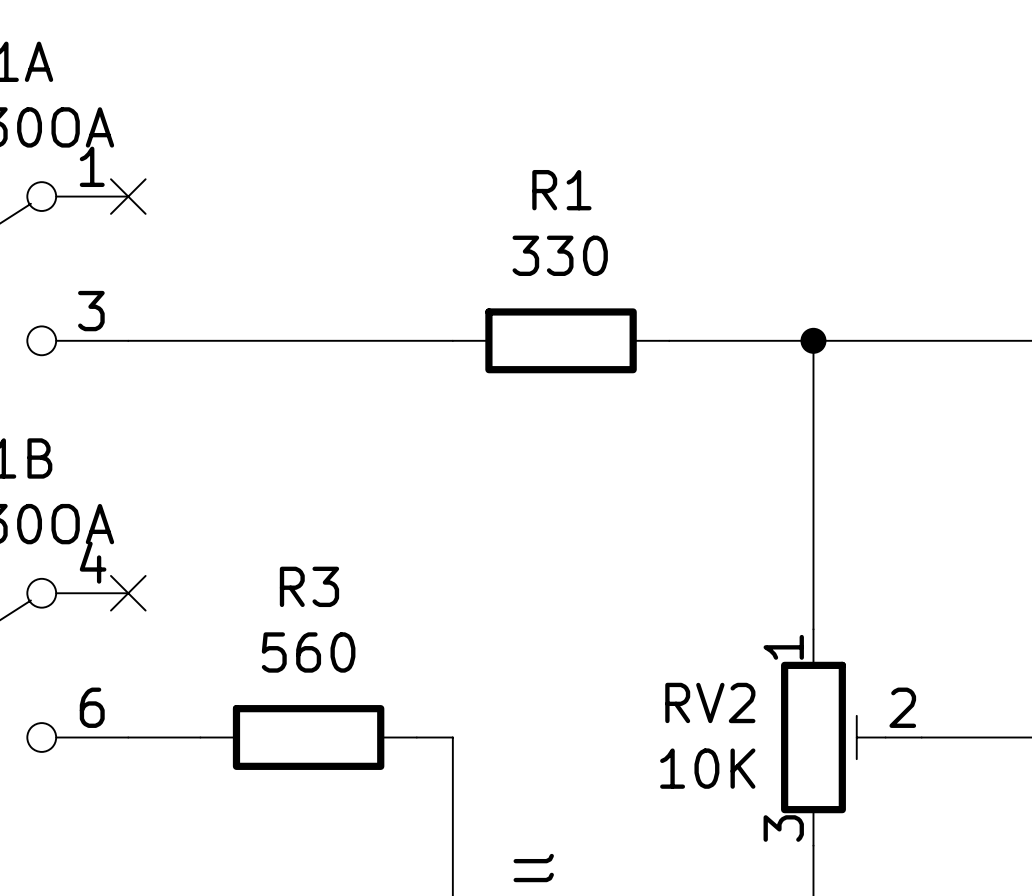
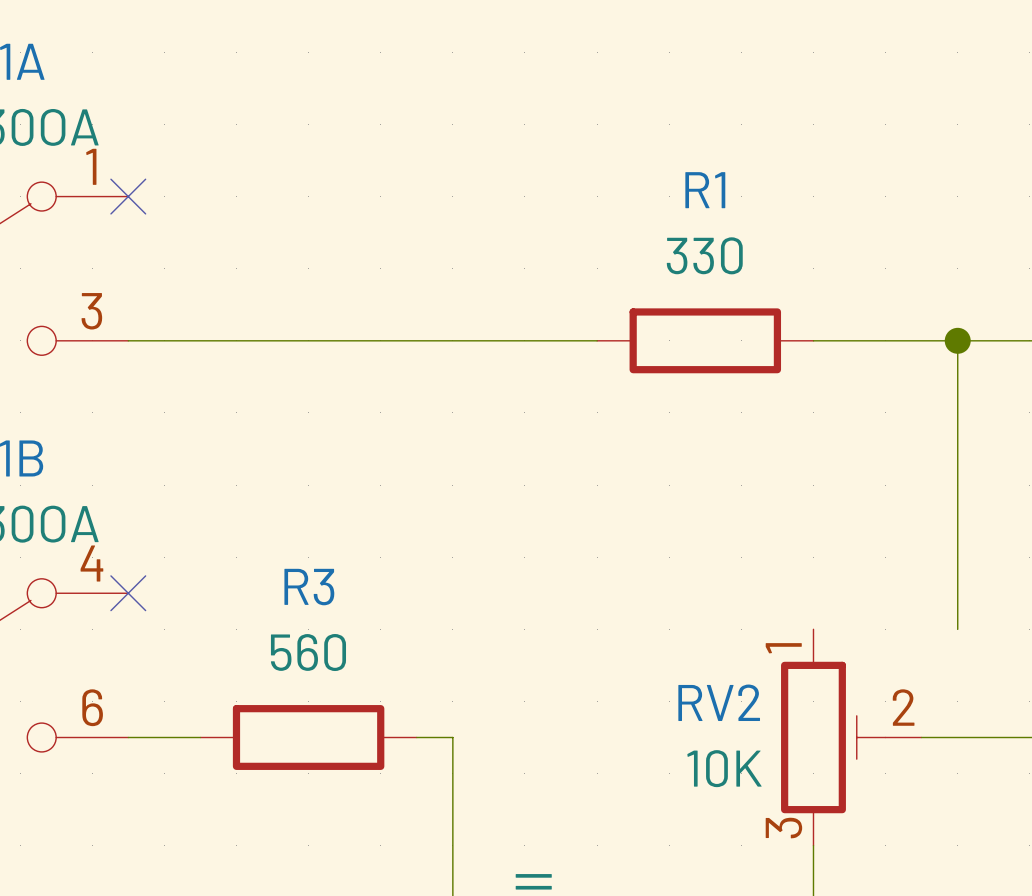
wire: none -> (452, 340) (597, 340)
R1 position: (561, 340) -> (705, 340)
wire: (669, 340) (813, 340) (813, 629) -> none
junction: (813, 340) -> none
wire: none -> (957, 340) (957, 629)
junction: none -> (957, 340)

